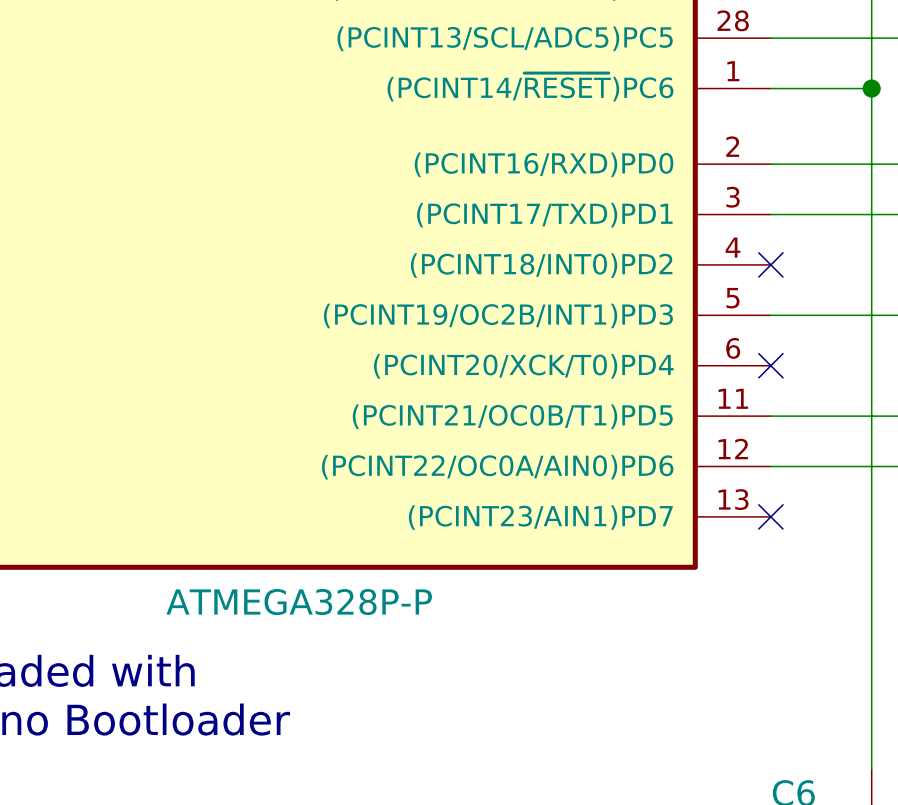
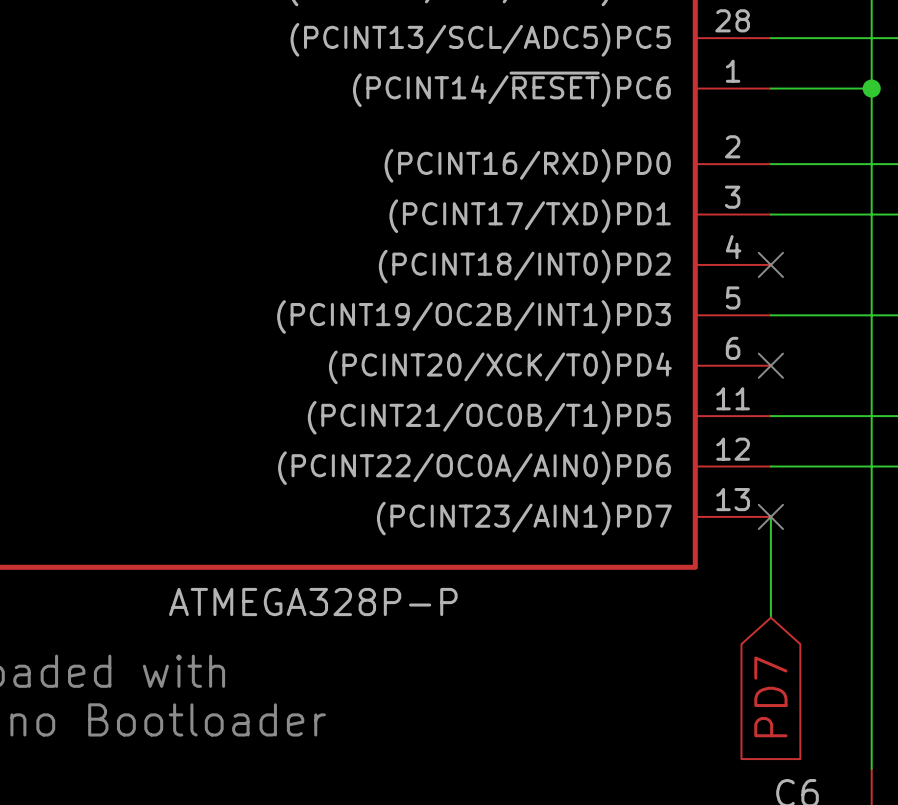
wire: none -> (770, 516) (770, 617)
global label: none -> PD7 (770, 696)

